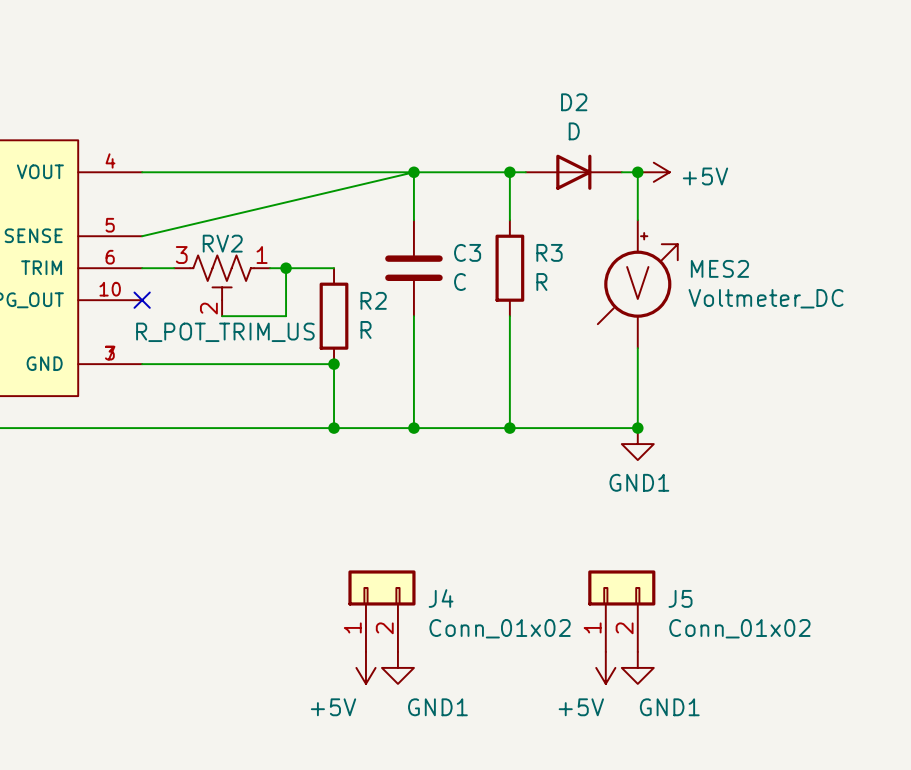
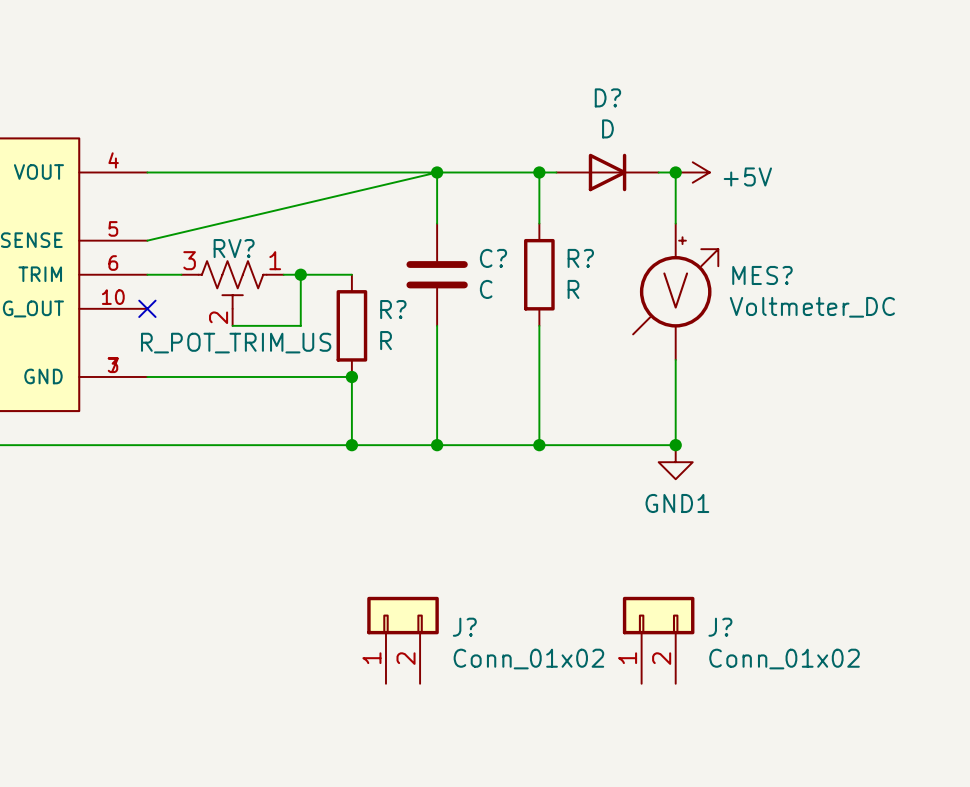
D2 name: D2 (574, 102) -> D? (607, 97)
RV2 name: RV2 (222, 243) -> RV? (234, 248)
C3 name: C3 (467, 252) -> C? (493, 258)
R3 name: R3 (549, 252) -> R? (580, 258)
MES2 name: MES2 (719, 268) -> MES? (762, 275)
R2 name: R2 (373, 300) -> R? (393, 309)
J4 name: J4 (441, 598) -> J? (464, 627)
J5 name: J5 (680, 598) -> J? (720, 627)
power symbol: +5V (365, 667) -> none
power symbol: GND1 (397, 667) -> none
power symbol: +5V (605, 667) -> none
power symbol: GND1 (637, 667) -> none

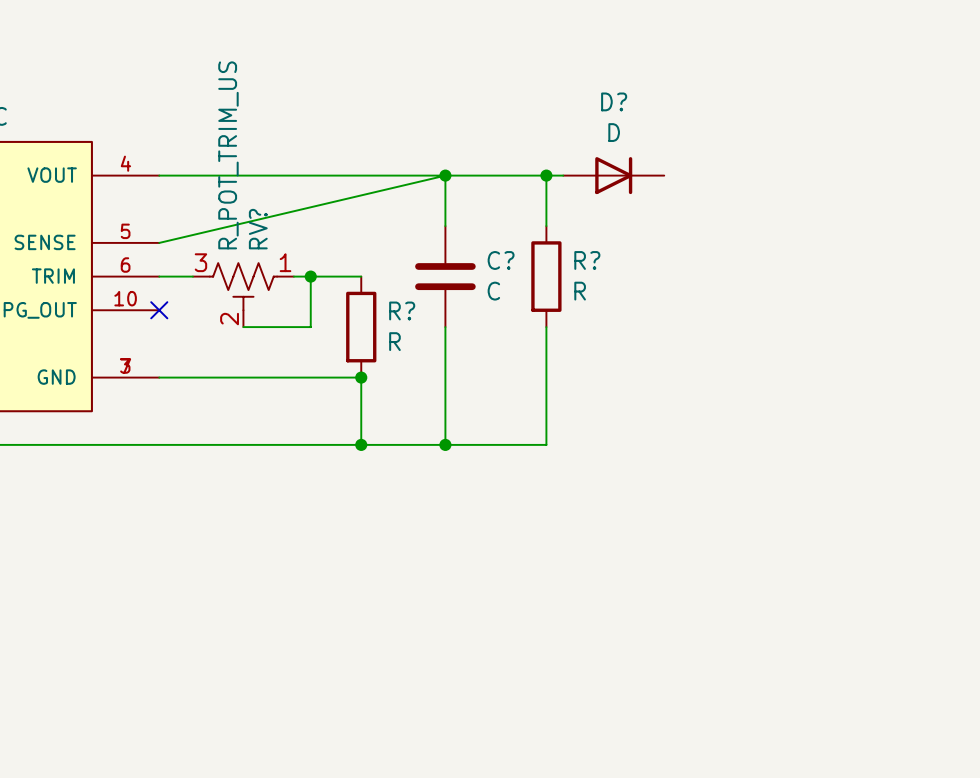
wire: (658, 172) (675, 172) (675, 223) -> none
junction: (675, 172) -> none
power symbol: +5V (692, 172) -> none
RV? name rotation: 0° (234, 248) -> 90° counterclockwise (258, 229)
MES?: Voltmeter_DC (675, 291) -> none
RV? value rotation: 0° (236, 343) -> 90° counterclockwise (228, 155)
wire: (675, 359) (675, 445) (539, 445) -> none
junction: (539, 445) -> none
junction: (675, 445) -> none
power symbol: GND1 (675, 462) -> none
J?: Conn_01x02 (403, 640) -> none
J?: Conn_01x02 (658, 640) -> none

